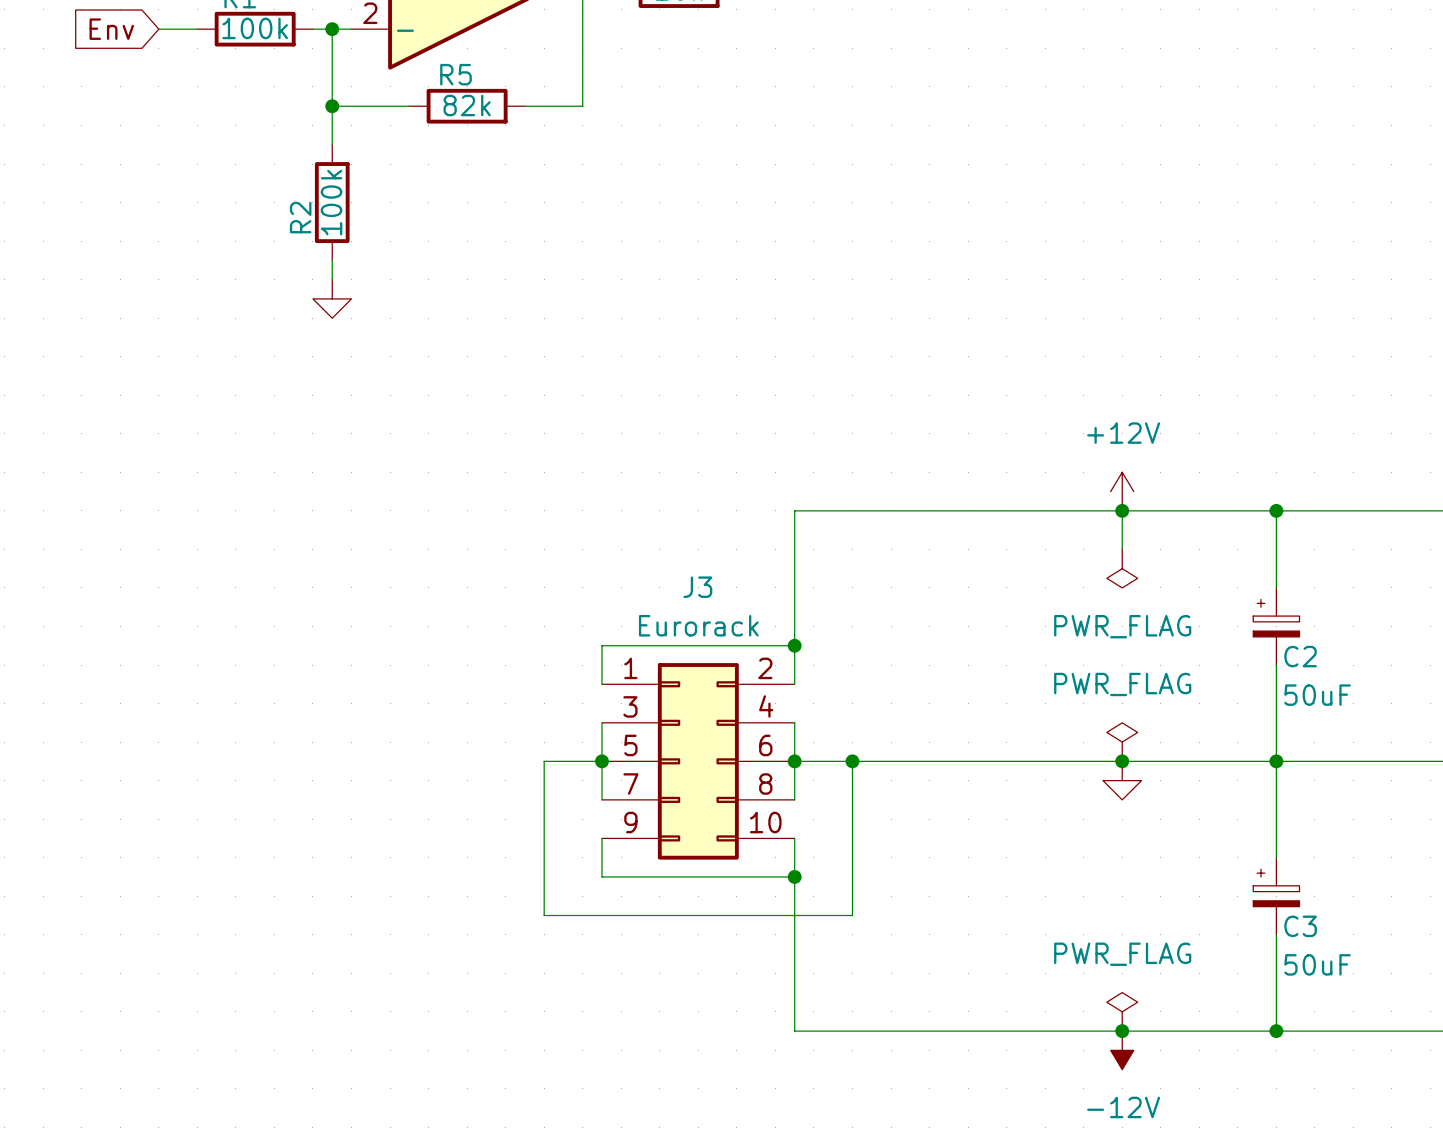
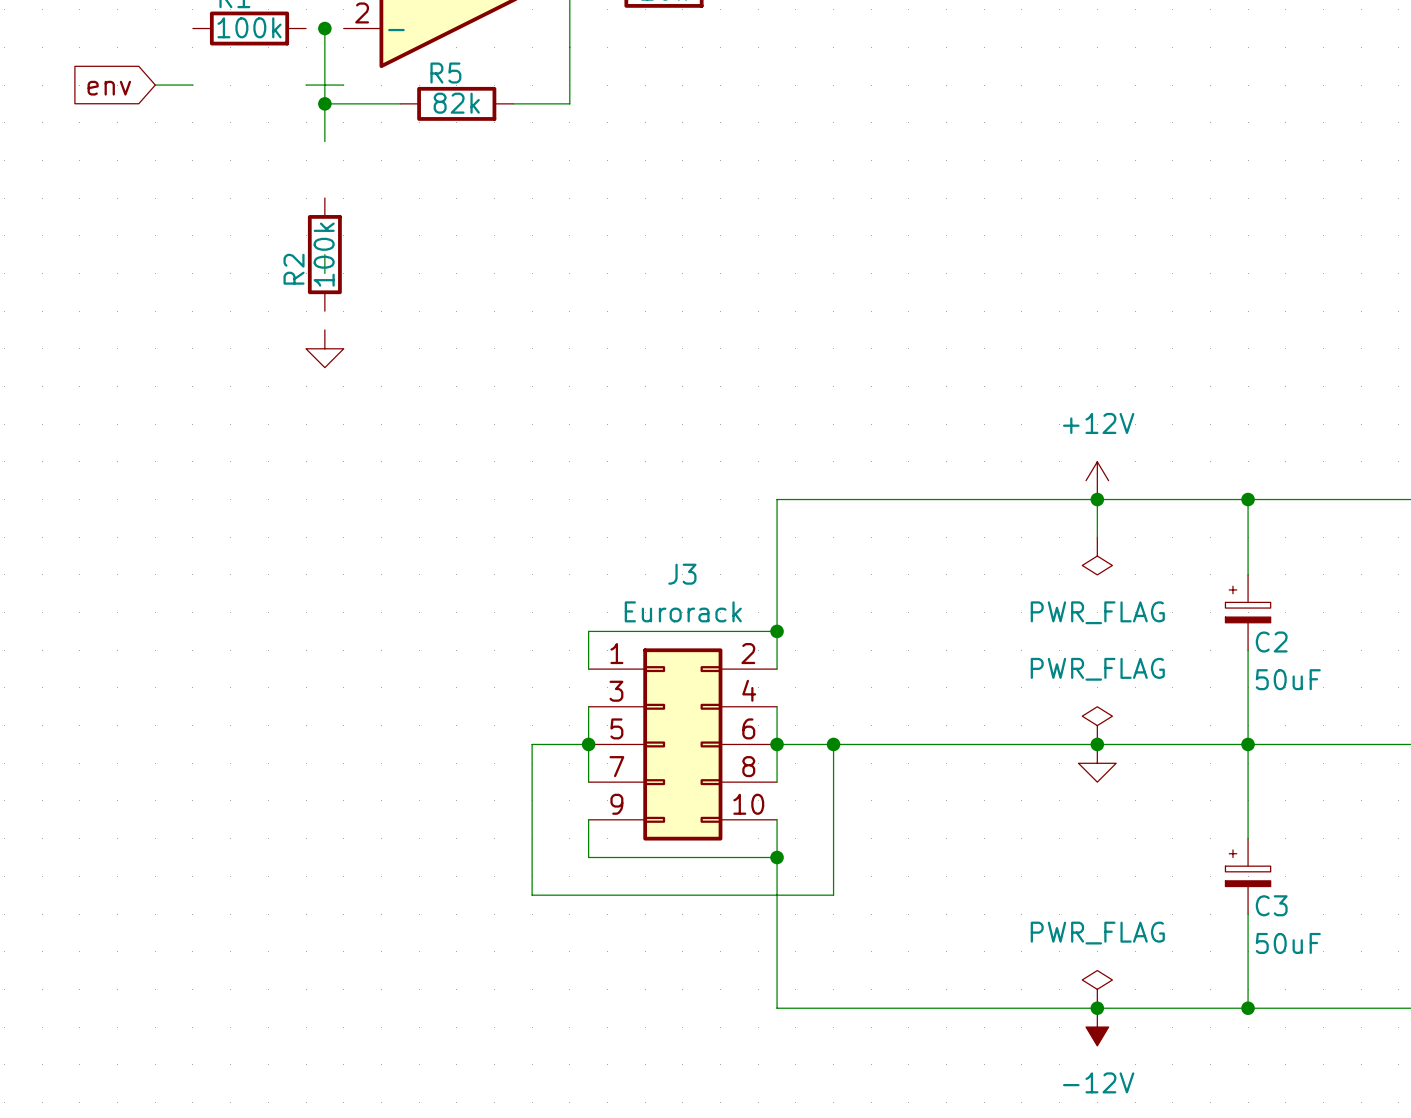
global label: Env (111, 29) -> none
wire: (158, 29) (197, 29) -> (155, 85) (192, 85)
wire: (312, 29) (351, 29) -> (306, 85) (343, 85)
global label: none -> env (109, 88)
R2 position: (332, 202) -> (324, 254)
power symbol position: (332, 298) -> (324, 348)

